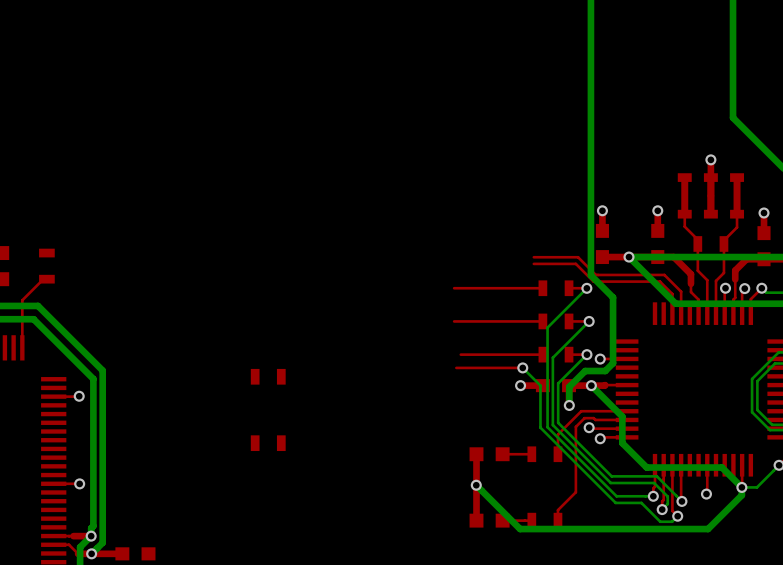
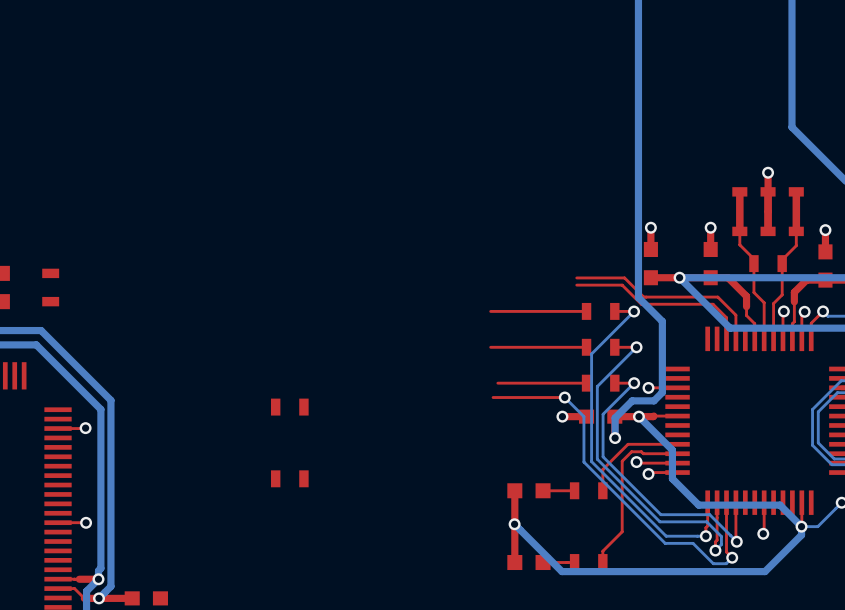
top track: (46, 279) (43, 279) (22, 300) (22, 347) -> none

